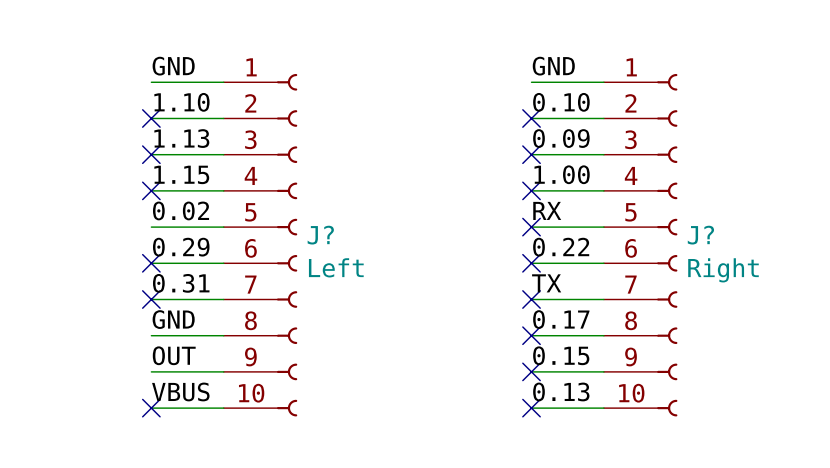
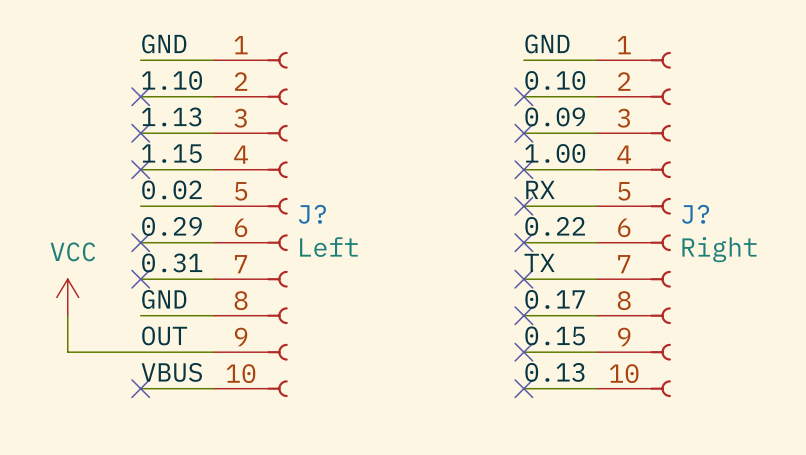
power symbol: none -> VCC (67, 297)
wire: none -> (67, 315) (67, 352) (140, 352)

